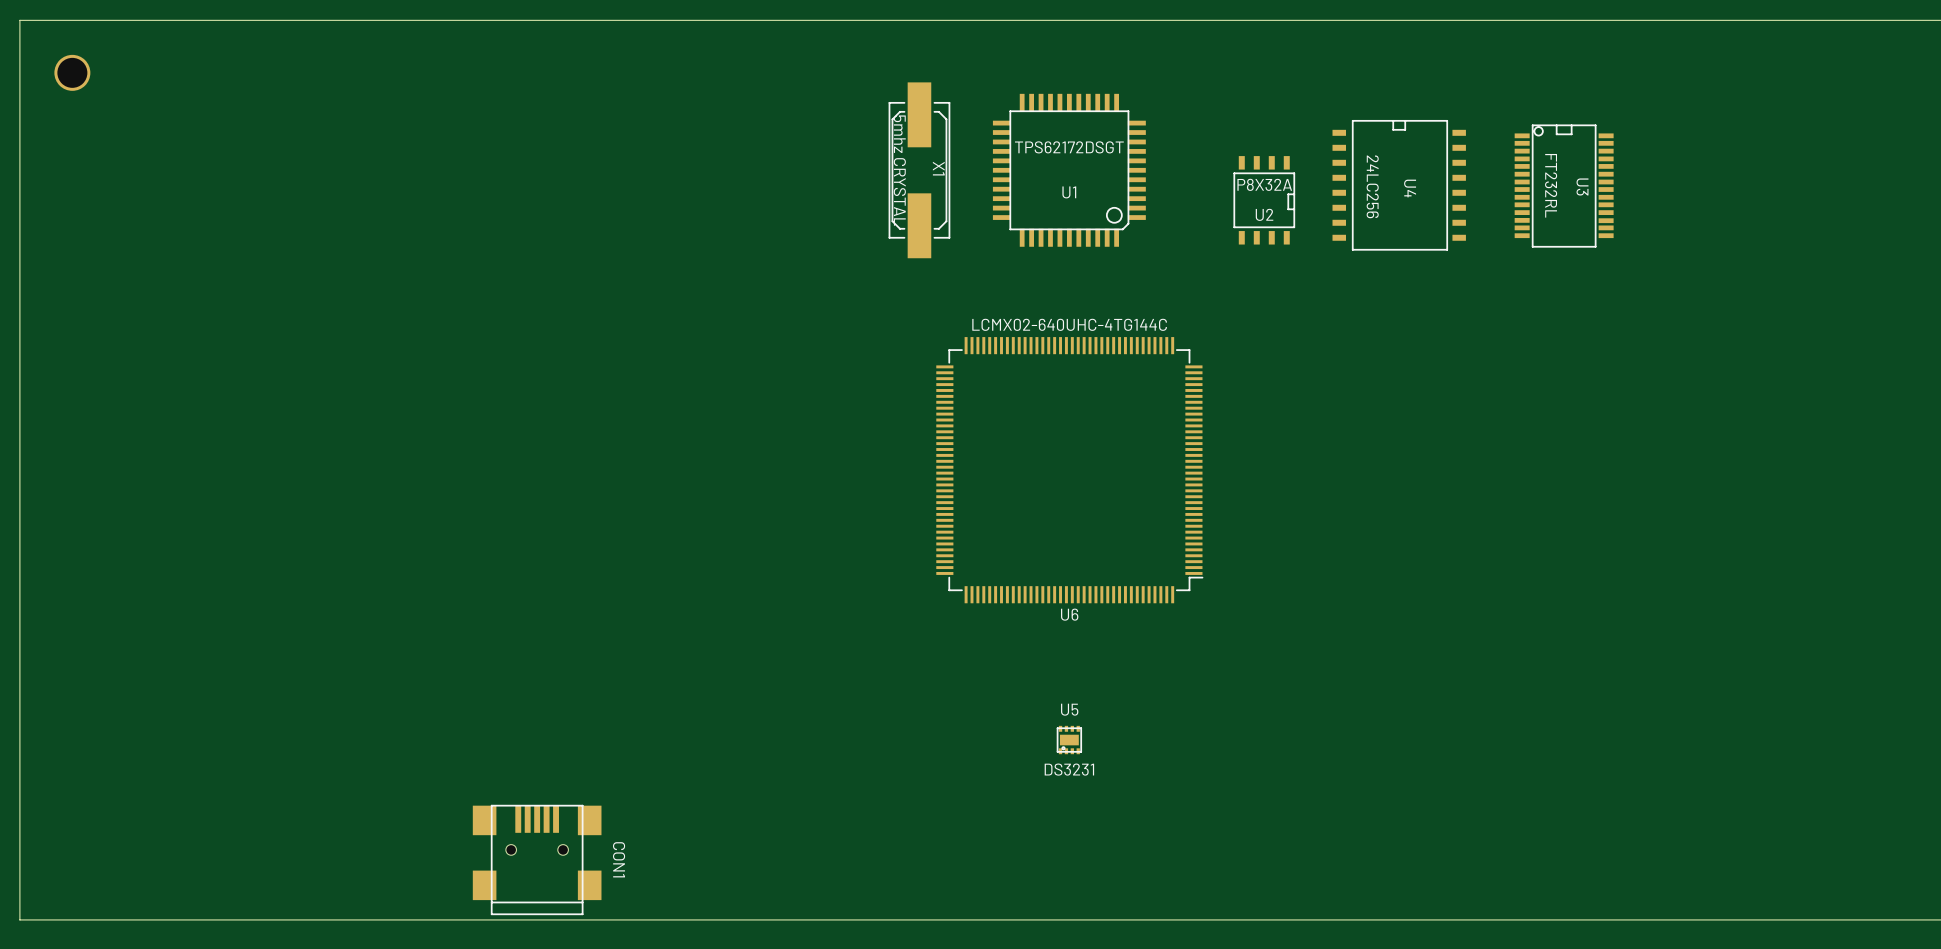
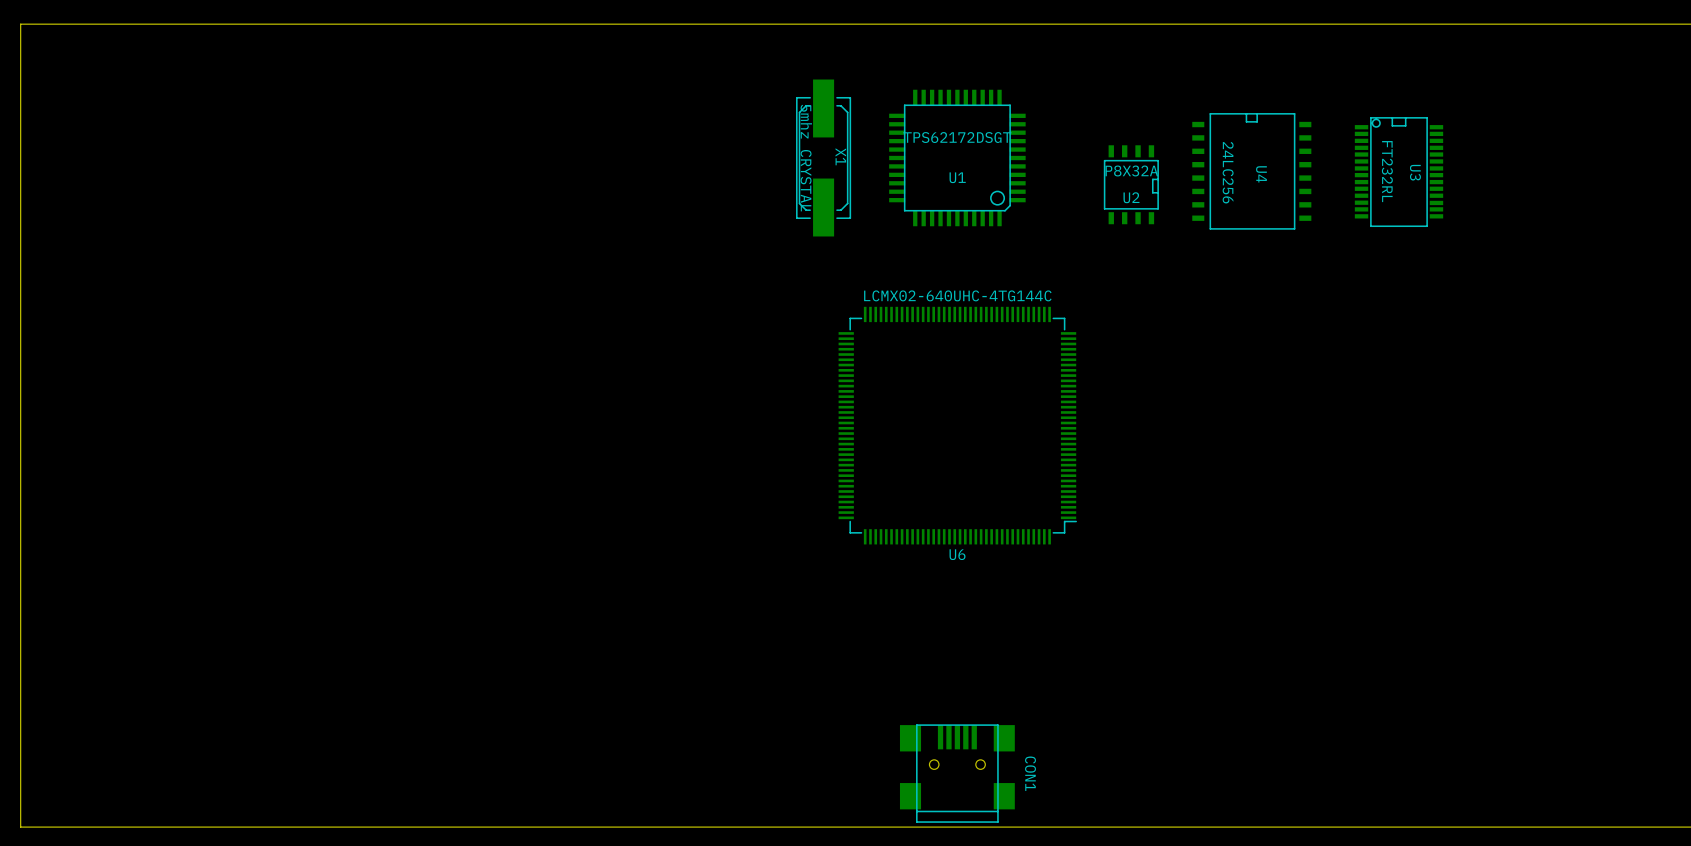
part: (72, 72) -> none
U5: DS3231 (1069, 740) -> none
CON1 position: (537, 859) -> (957, 773)

